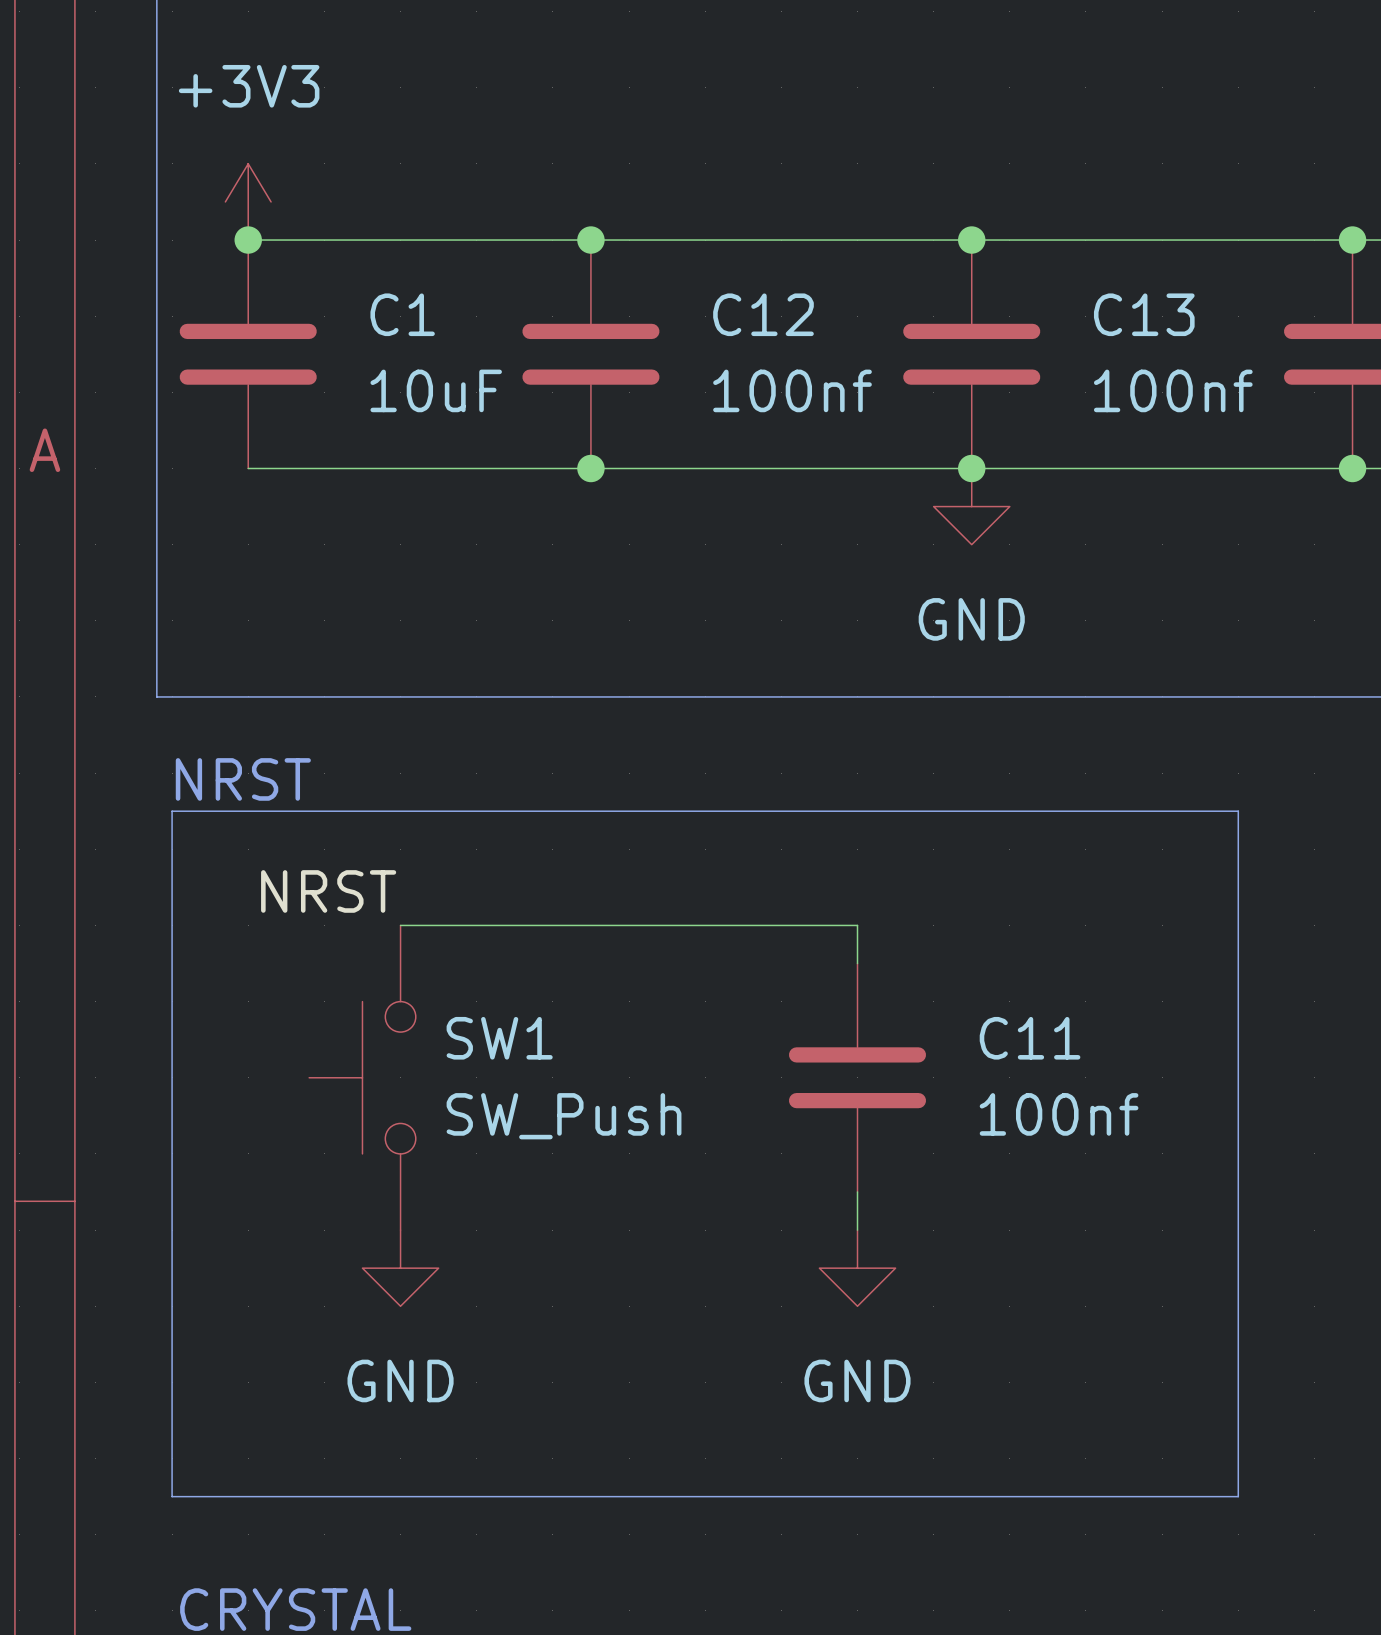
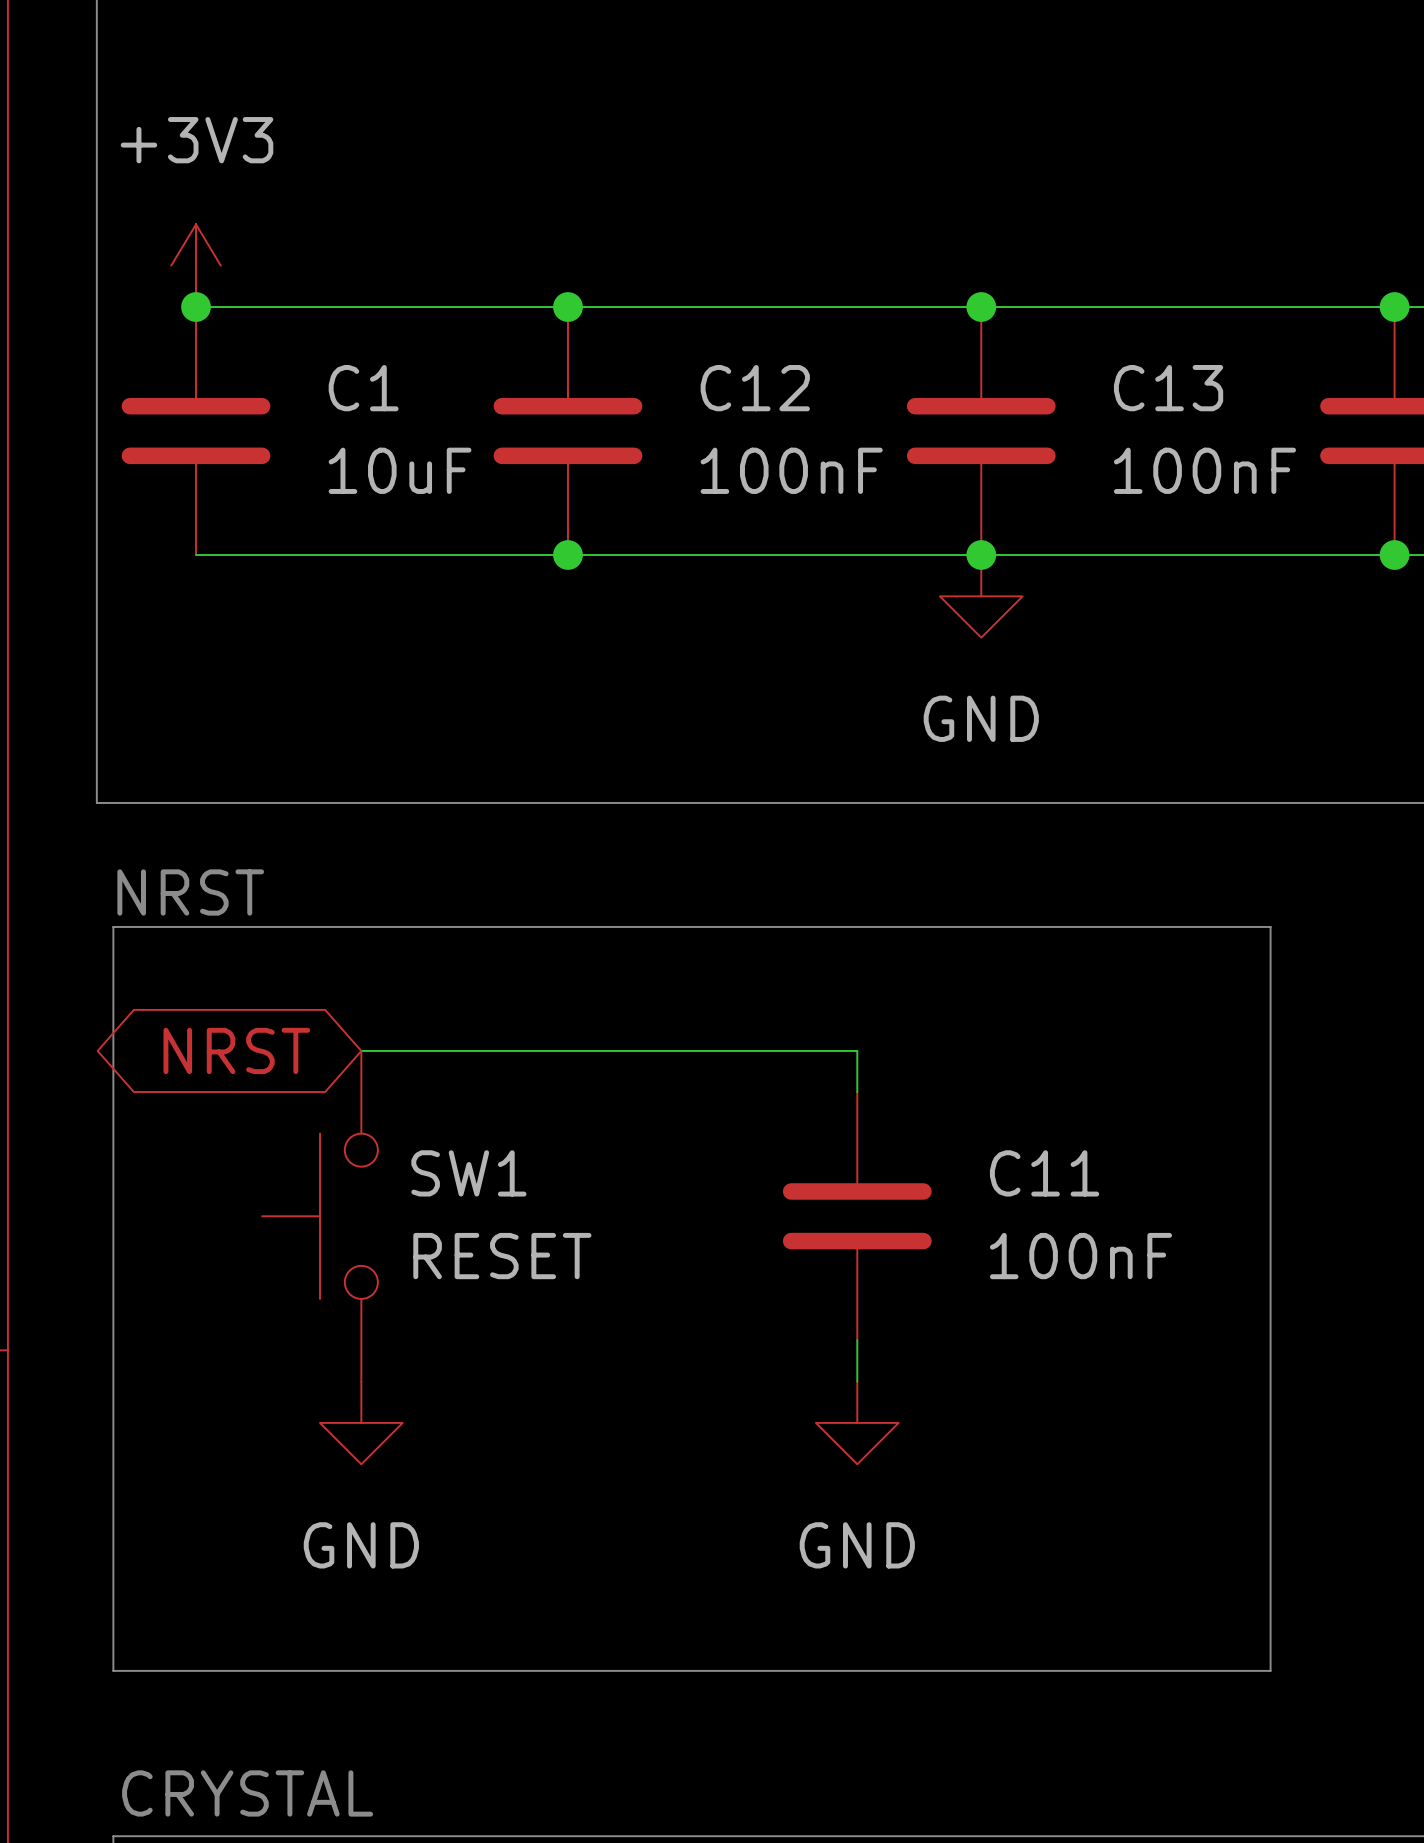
C12 value: 100nf (792, 390) -> 100nF (791, 470)
C13 value: 100nf (1173, 390) -> 100nF (1204, 470)
label: NRST (328, 891) -> none
global label: none -> NRST (236, 1050)
C11 value: 100nf (1059, 1114) -> 100nF (1080, 1256)
SW1 value: SW_Push (564, 1116) -> RESET (502, 1256)

